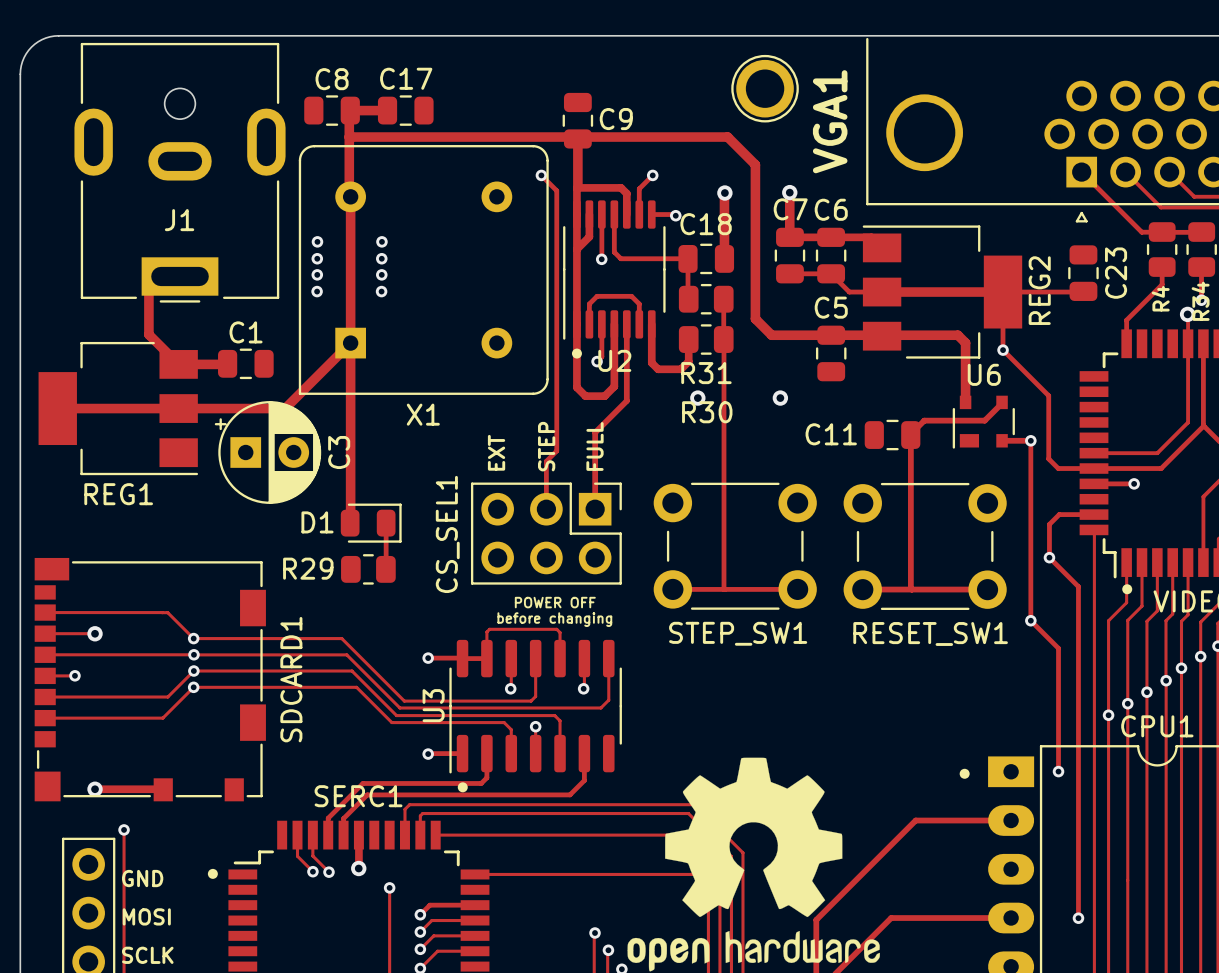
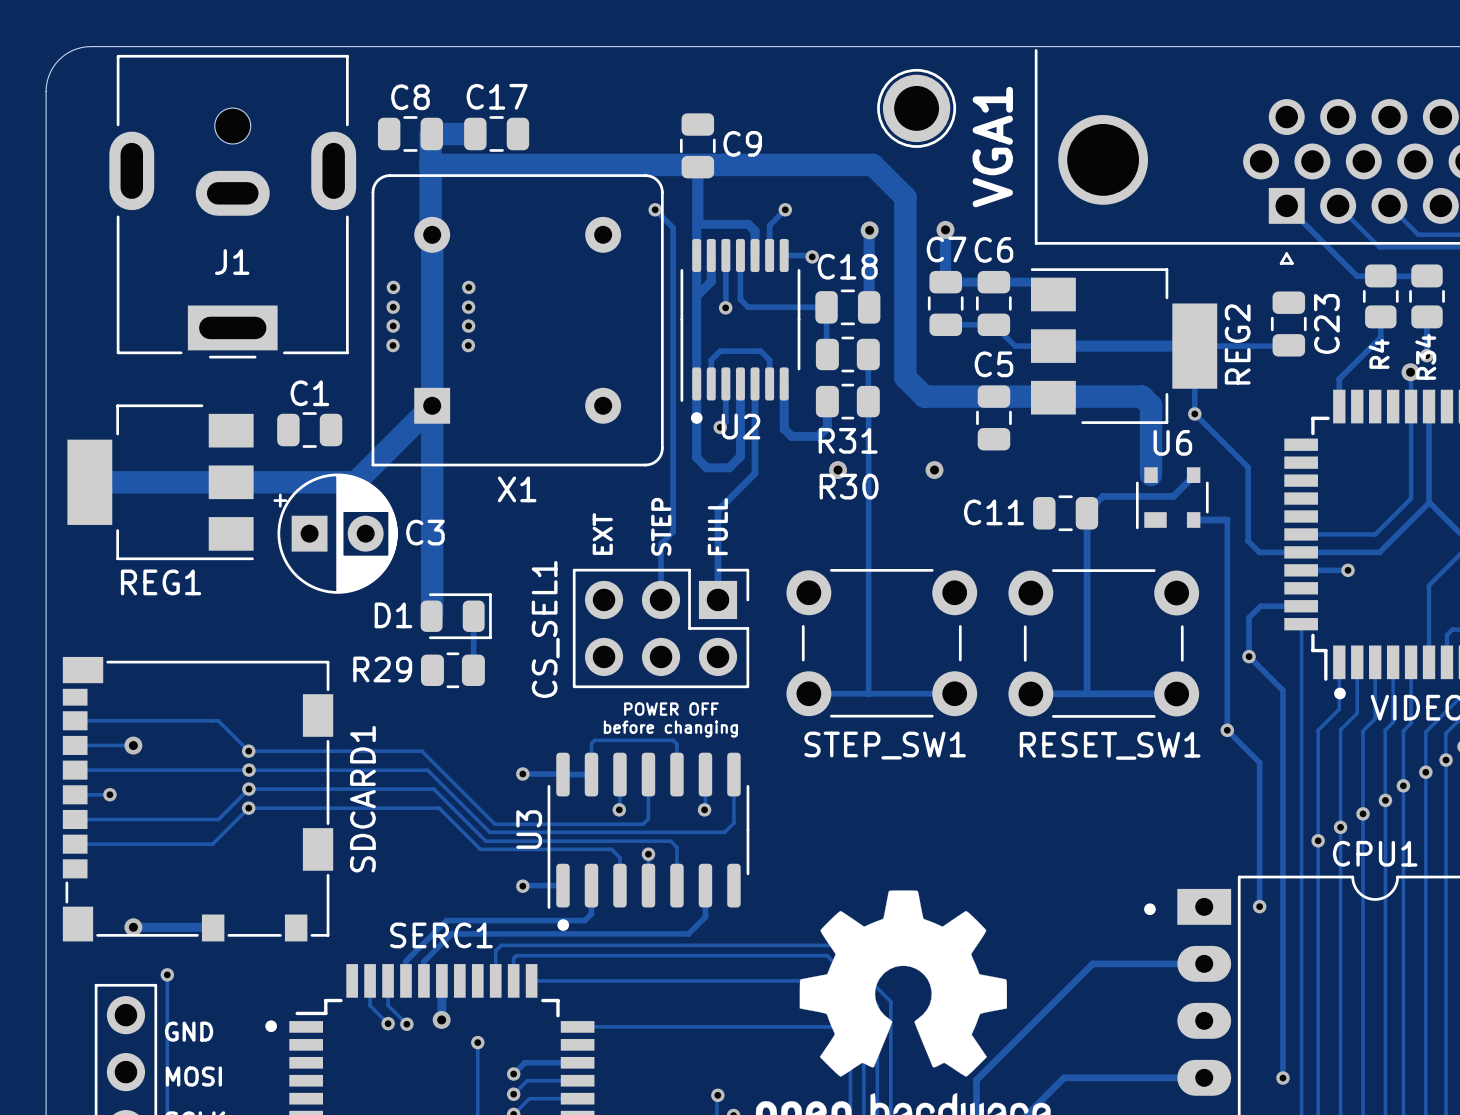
track width: thin (387, 110) (349, 111) (349, 196) -> thick (475, 133) (430, 135) (430, 234)
track width: thin (349, 137) (727, 137) (755, 164) (755, 318) (771, 335) (957, 335) (965, 342) (965, 402) -> thick (430, 164) (872, 164) (905, 197) (905, 377) (924, 396) (1142, 396) (1151, 405) (1151, 475)
track width: thin (350, 196) (350, 521) -> thick (432, 234) (432, 614)
track: (148, 277) (148, 334) (178, 364) (227, 364) -> none
track width: thin (350, 343) (285, 408) (57, 408) -> thick (432, 405) (355, 482) (89, 482)
via: (1030, 440) -> none
C3 name rotation: 0° (339, 452) -> 90° clockwise (425, 532)

